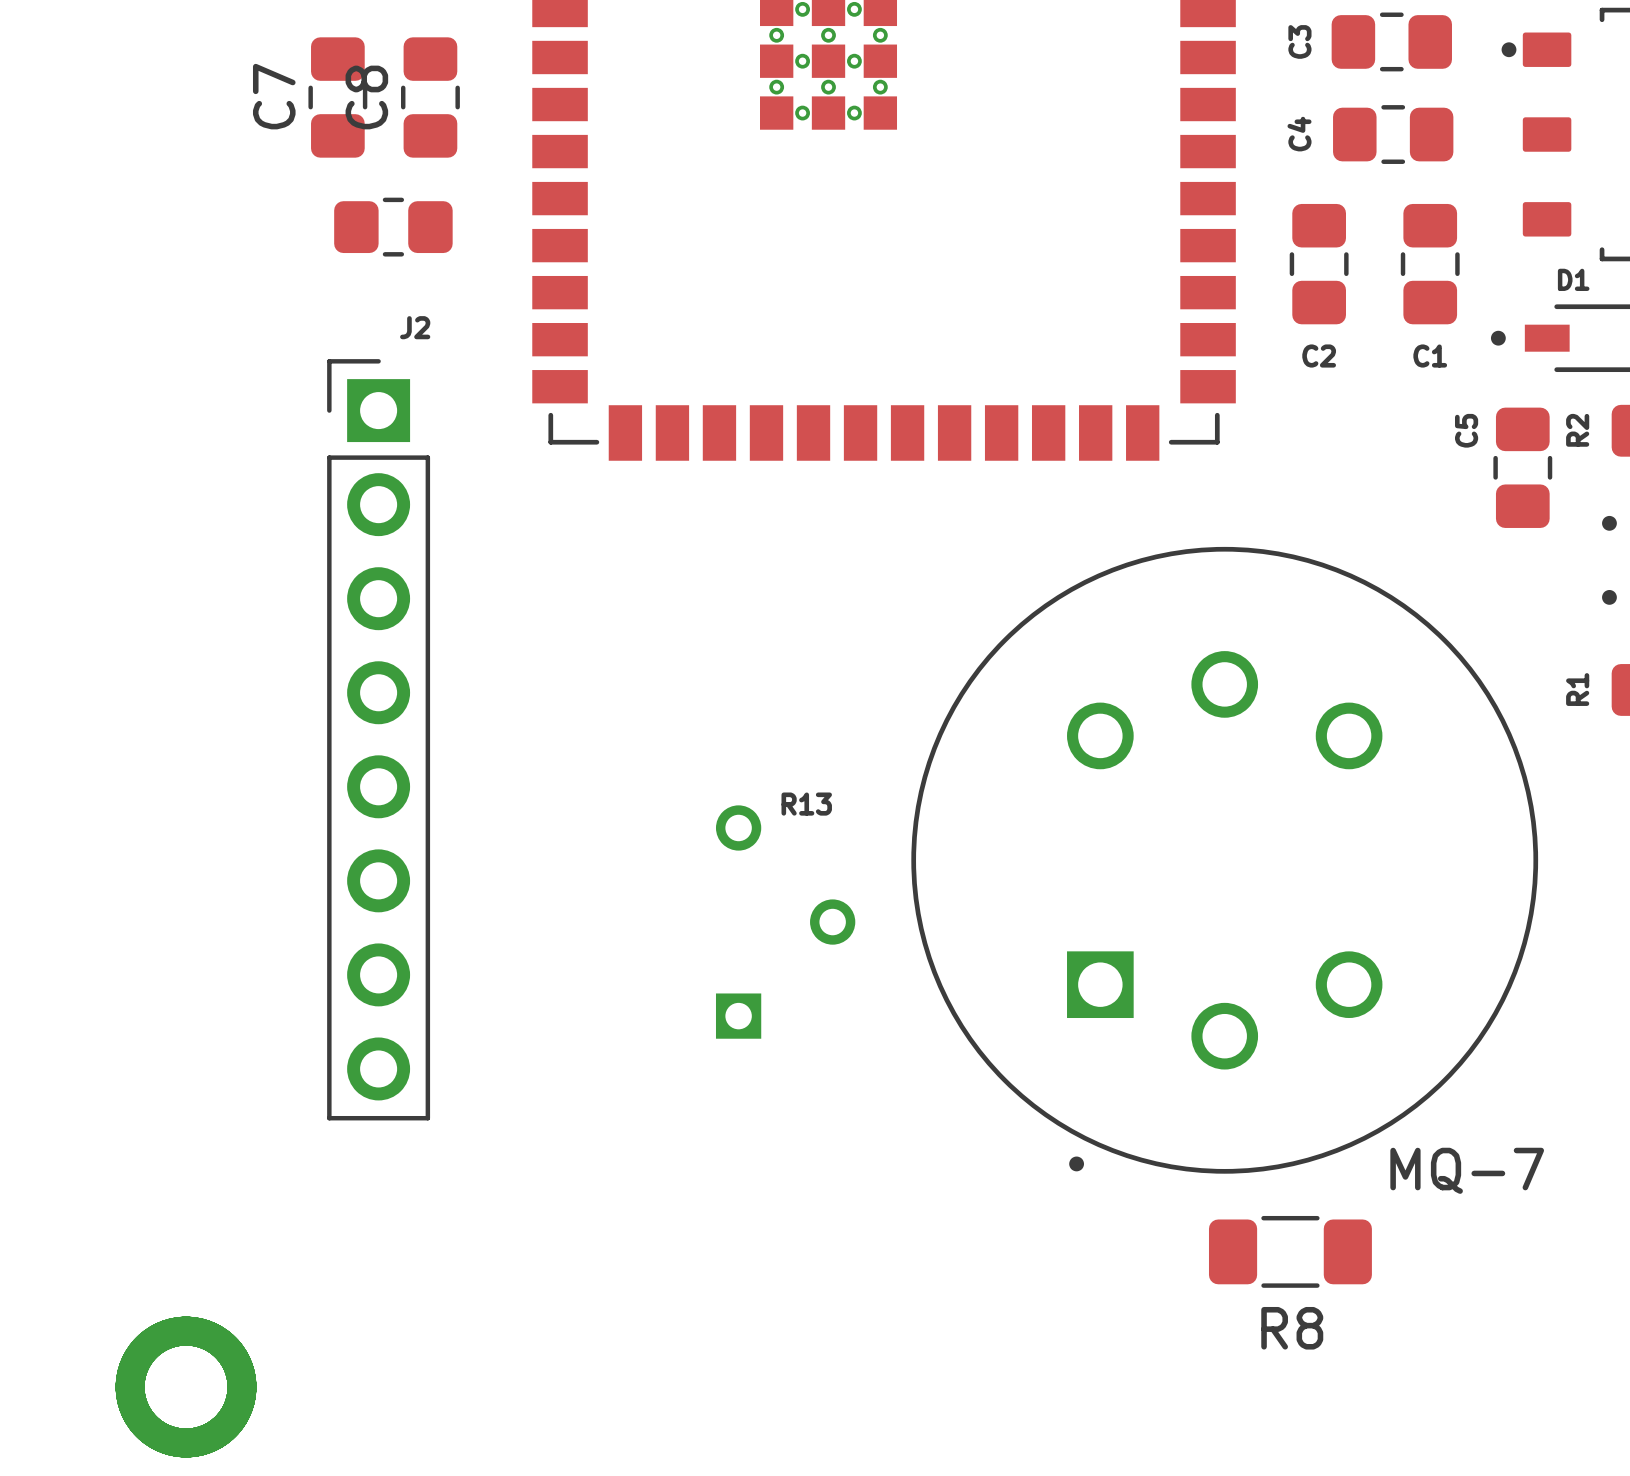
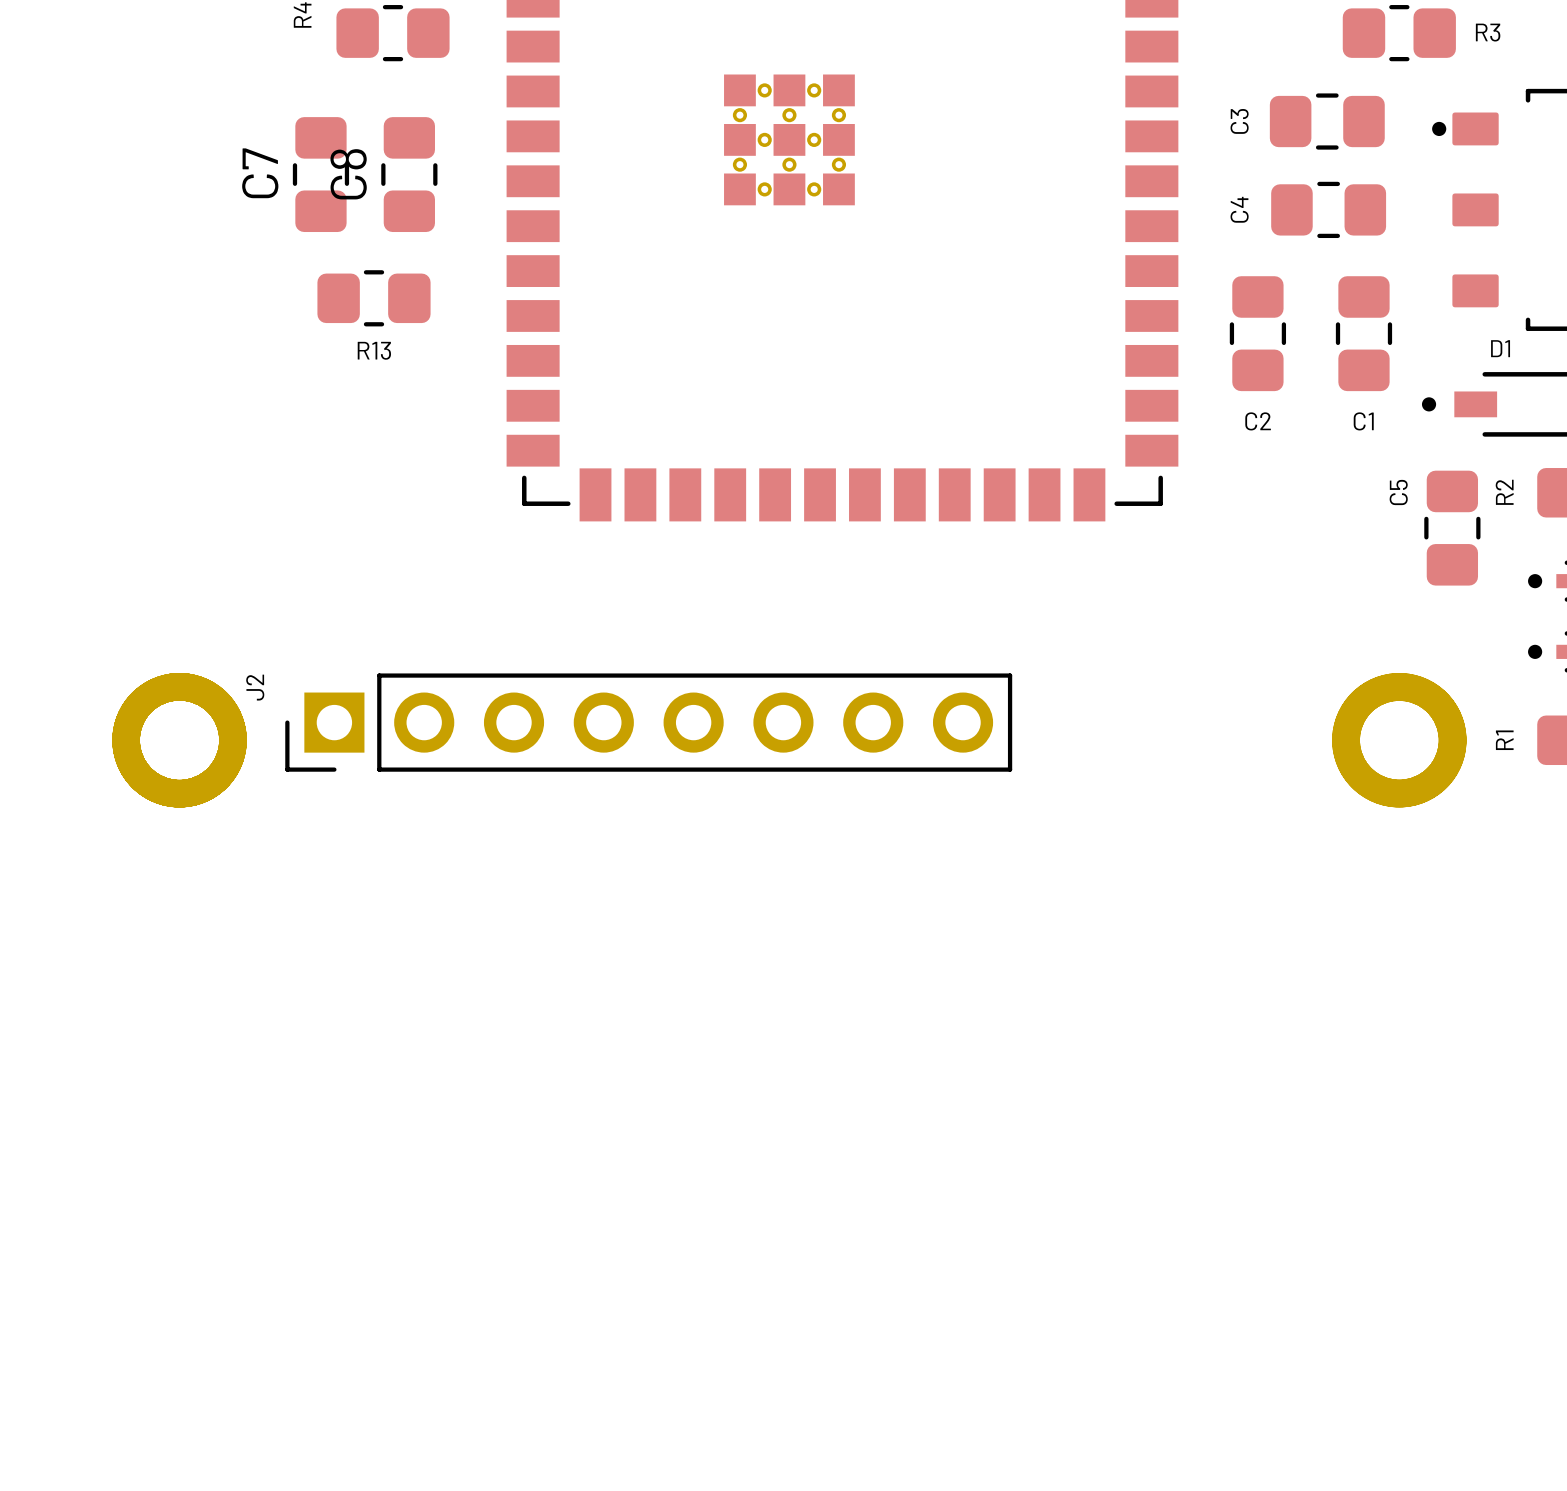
part: none -> (1399, 740)
J2 rotation: 0° (378, 739) -> 90° counterclockwise (648, 722)
R13 name position: R13 (806, 804) -> R13 (374, 350)
MQ-7: (1224, 860) -> none
part: (785, 922) -> none
R8: (1290, 1251) -> none
part position: (186, 1387) -> (179, 740)

